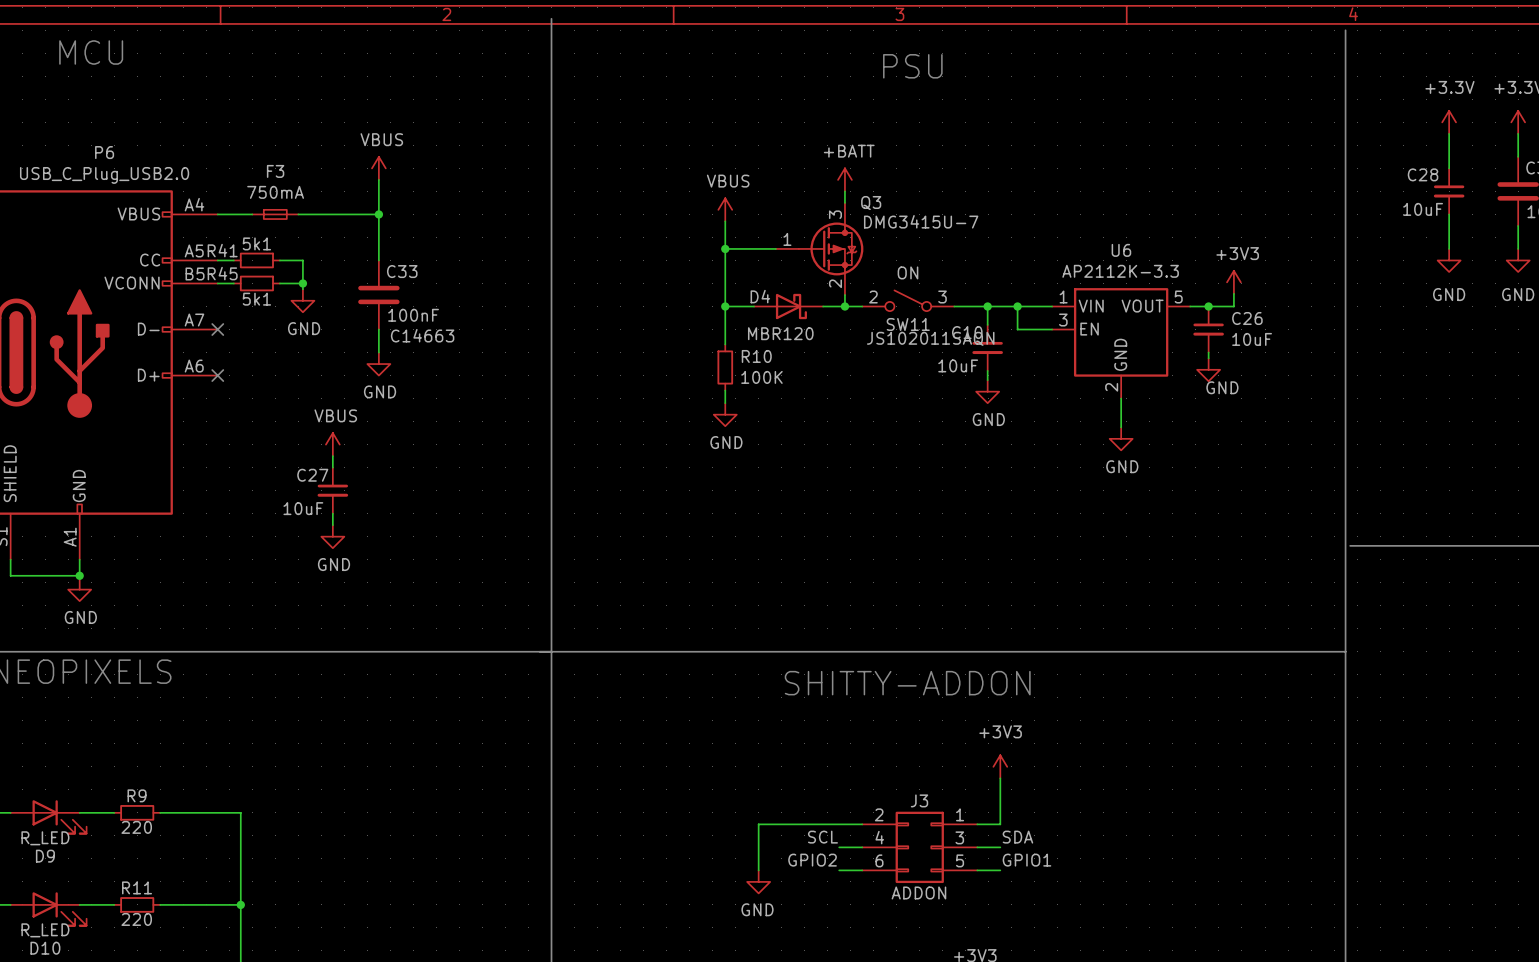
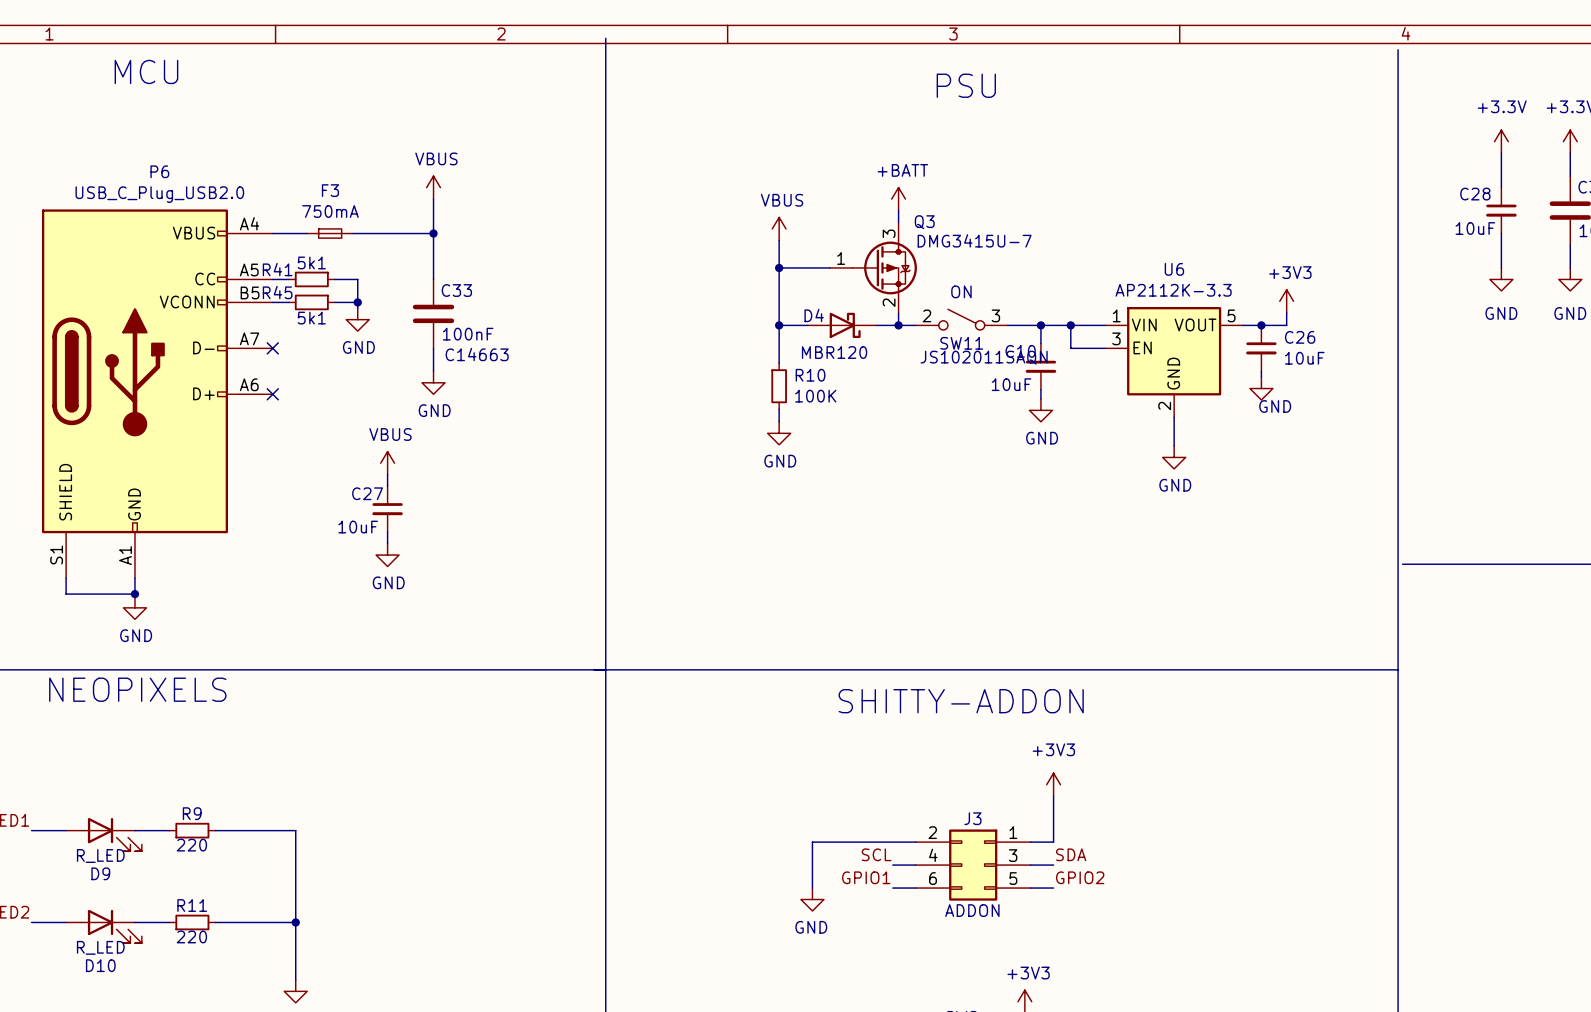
label: GPIO2 (812, 860) -> GPIO1 (866, 877)
label: GPIO1 (1026, 860) -> GPIO2 (1080, 877)

